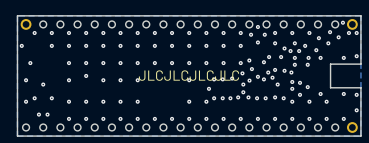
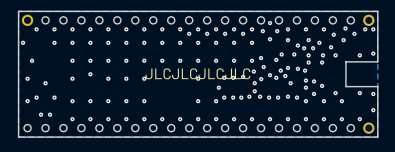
via: (342, 22) -> none
via: none -> (189, 33)
via: none -> (207, 33)
via: none -> (225, 33)
via: none -> (243, 33)

